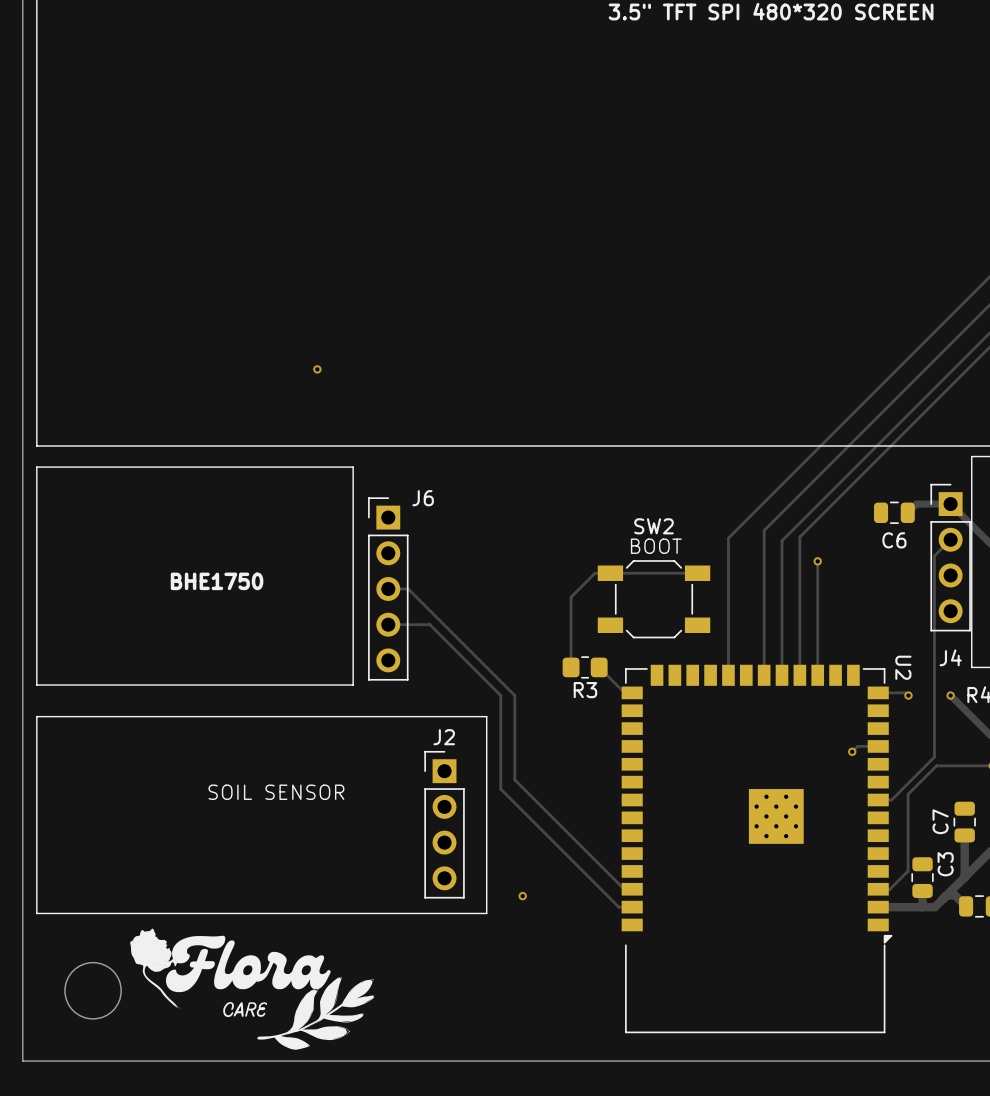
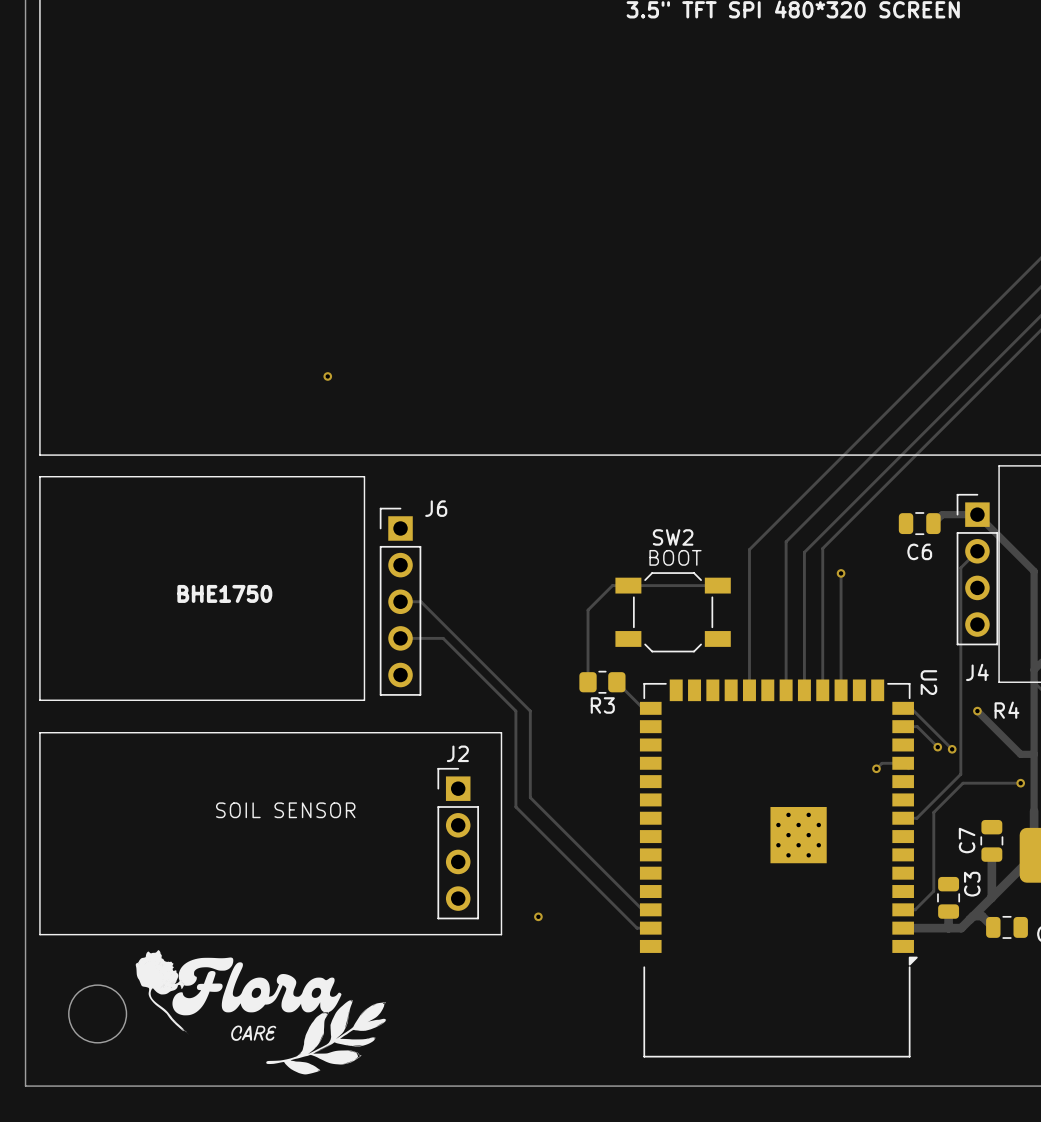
track: (886, 692) (905, 692) (908, 695) -> (911, 708) (952, 749)
via: (908, 695) -> none
track: none -> (903, 726) (917, 726) (937, 747)
via: none -> (937, 747)
via: none -> (952, 749)

